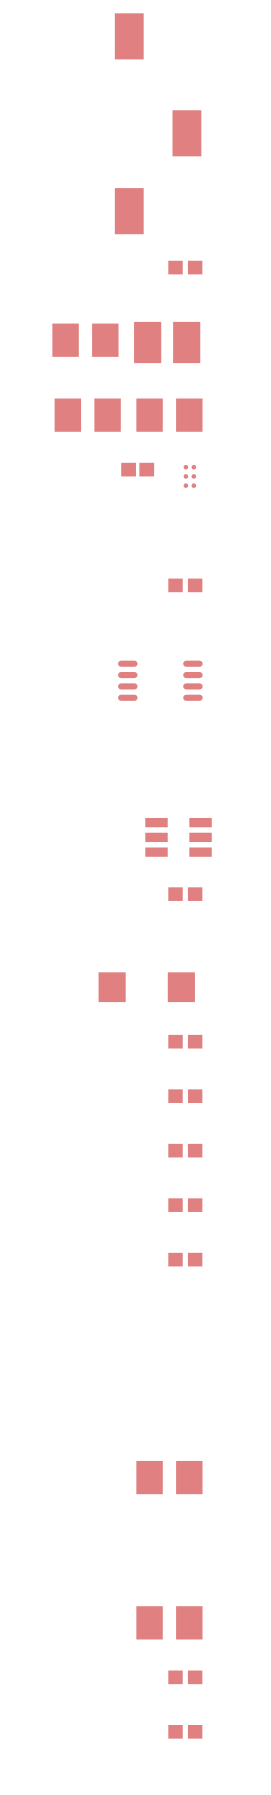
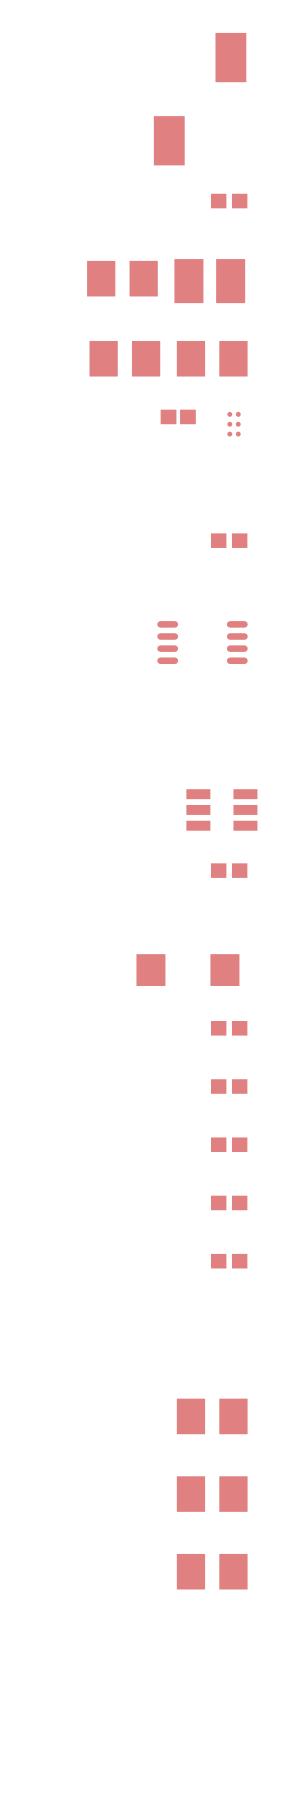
part: none -> (212, 1416)
part position: (169, 1622) -> (212, 1571)
part: (185, 1677) -> none
part: (185, 1731) -> none

